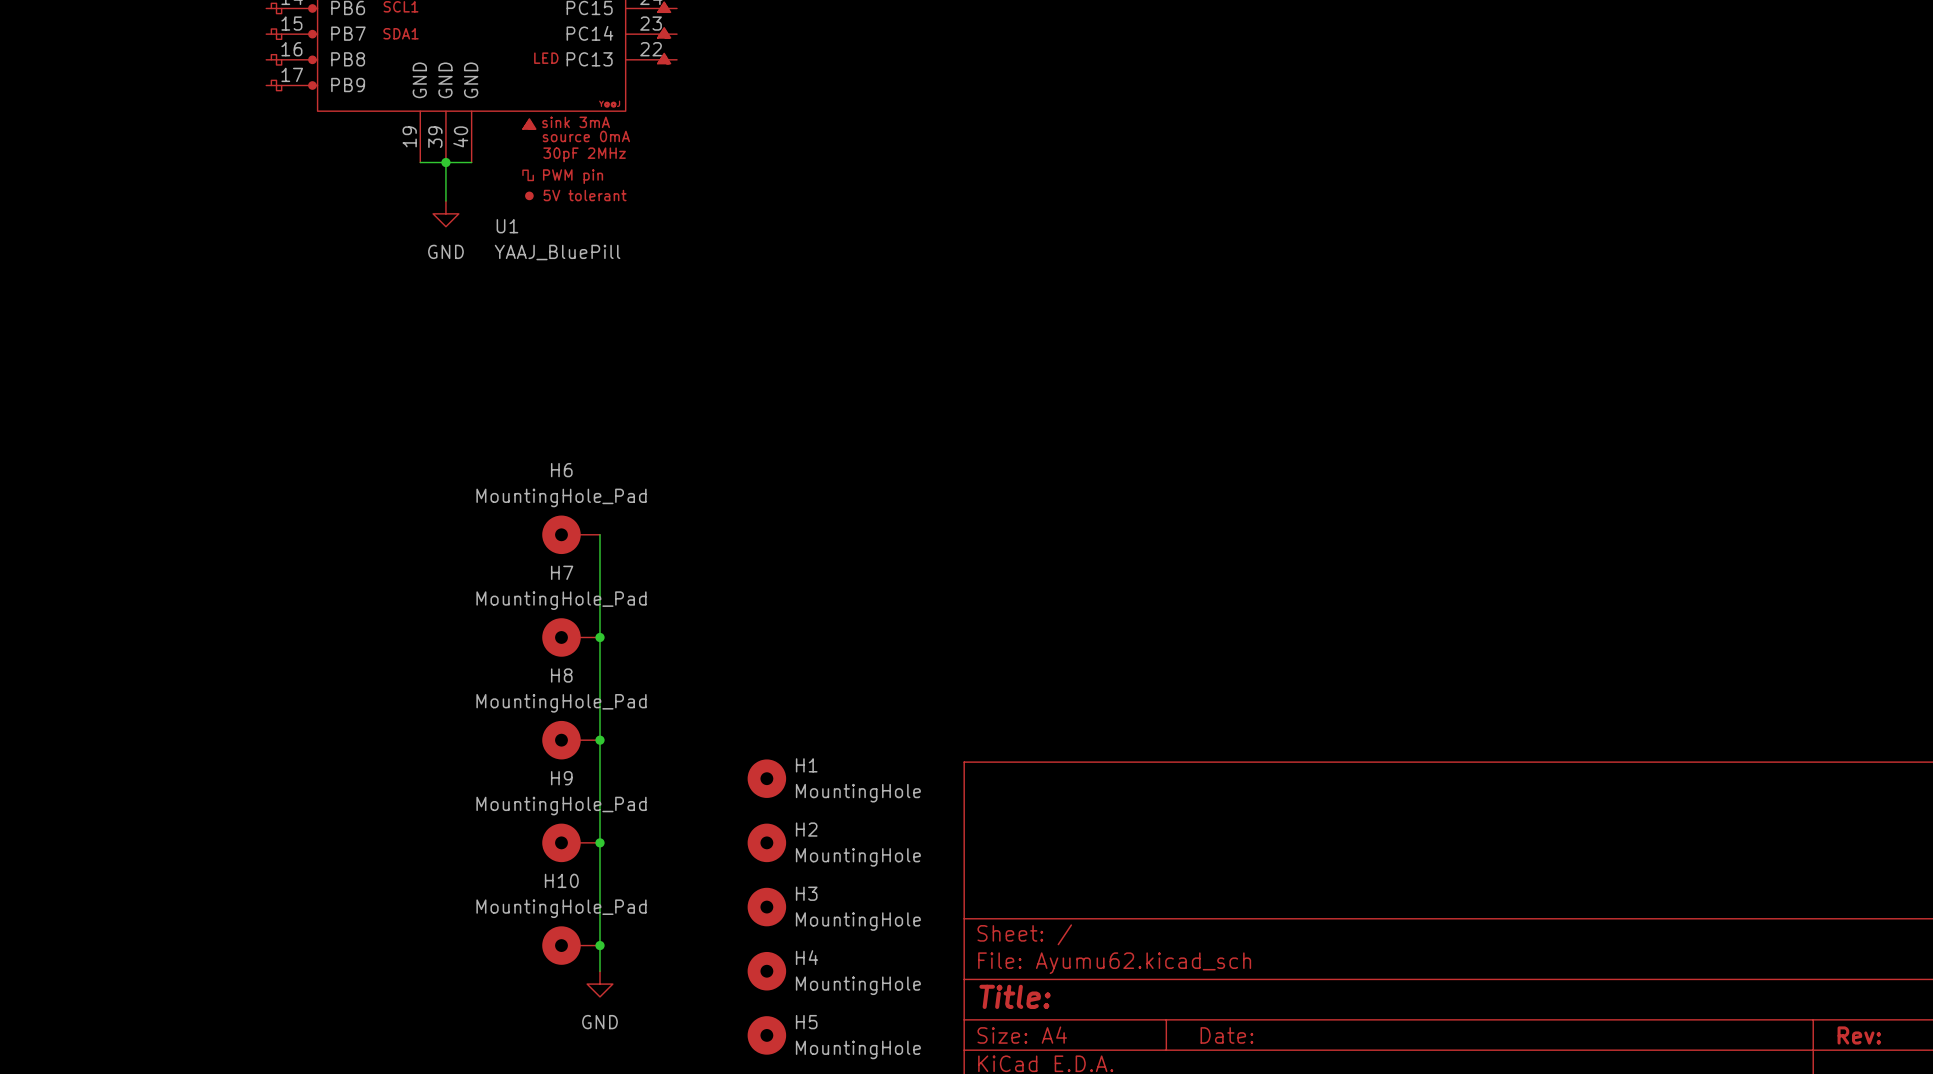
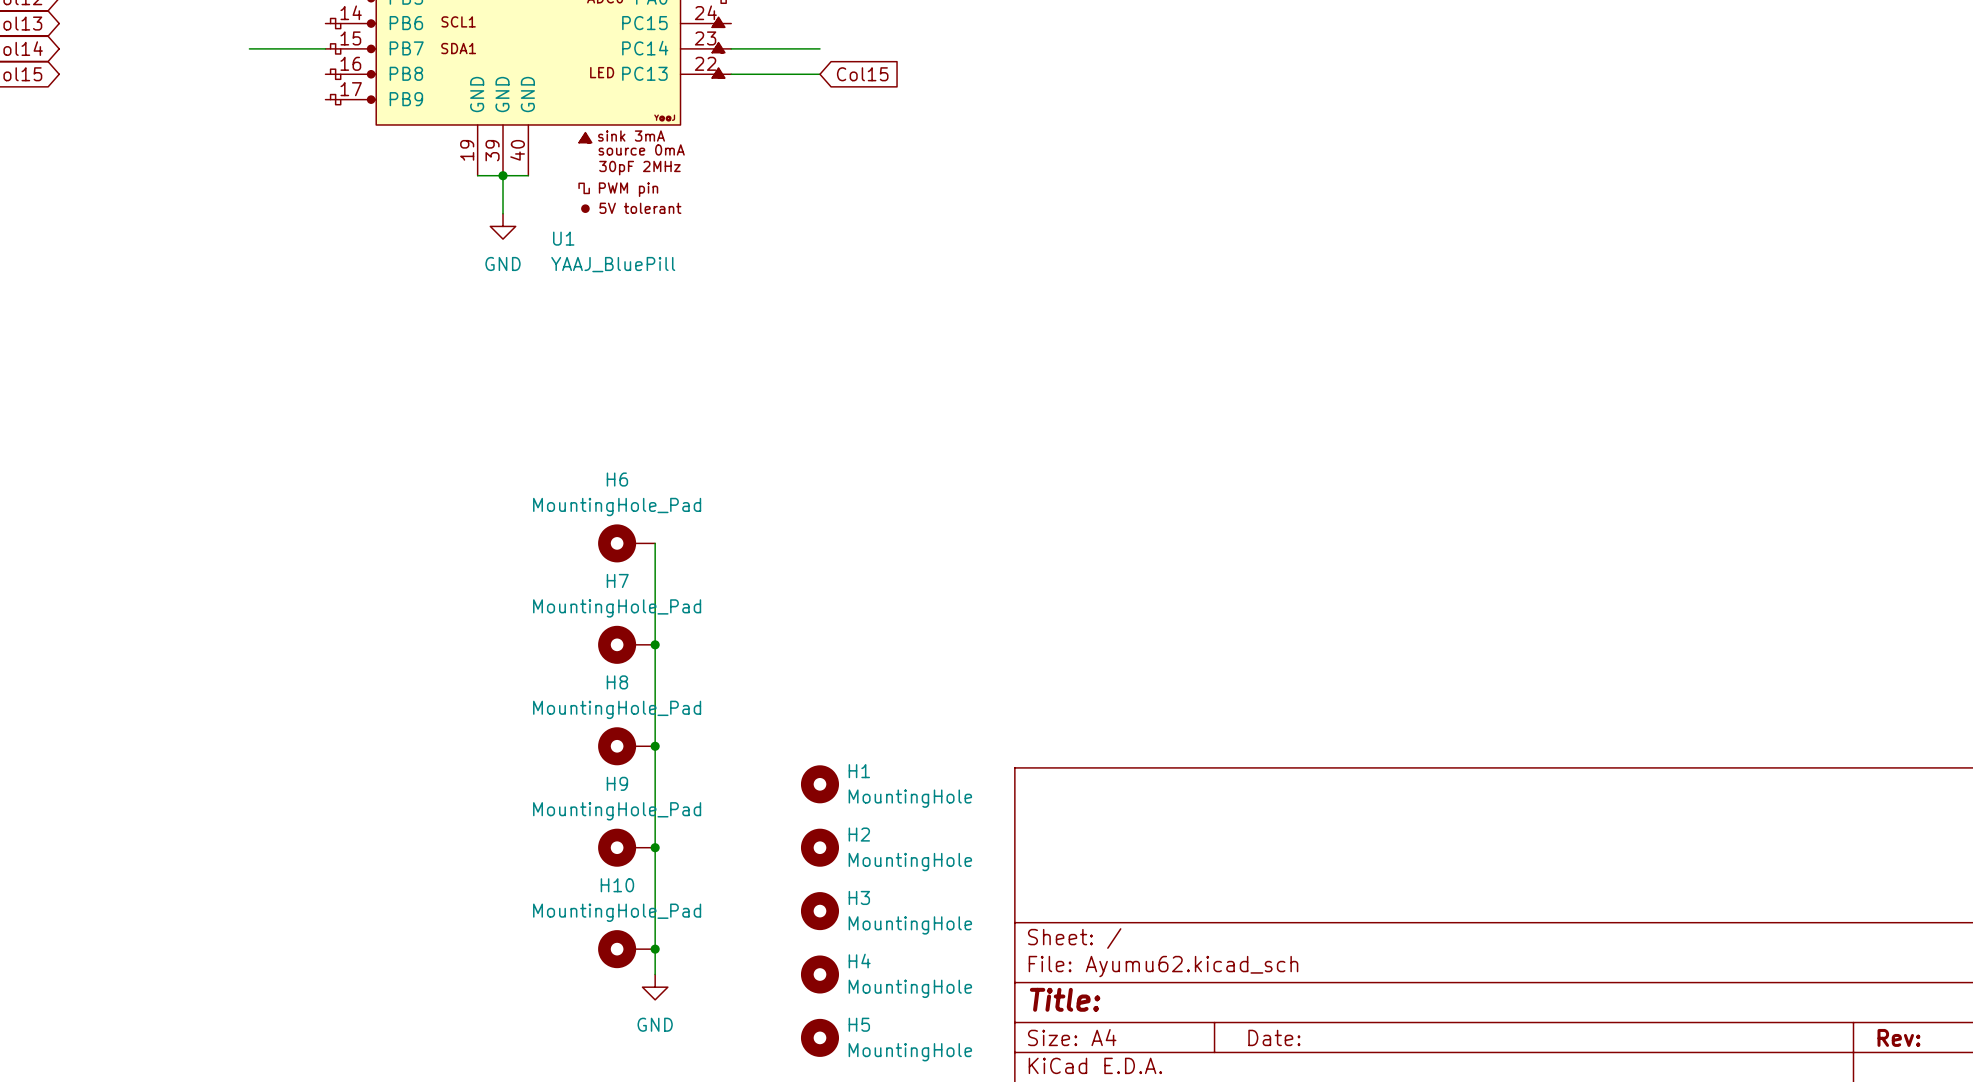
wire: none -> (249, 48) (325, 48)
wire: none -> (731, 48) (819, 48)
wire: none -> (731, 74) (819, 74)
global label: none -> Col15 (862, 74)

